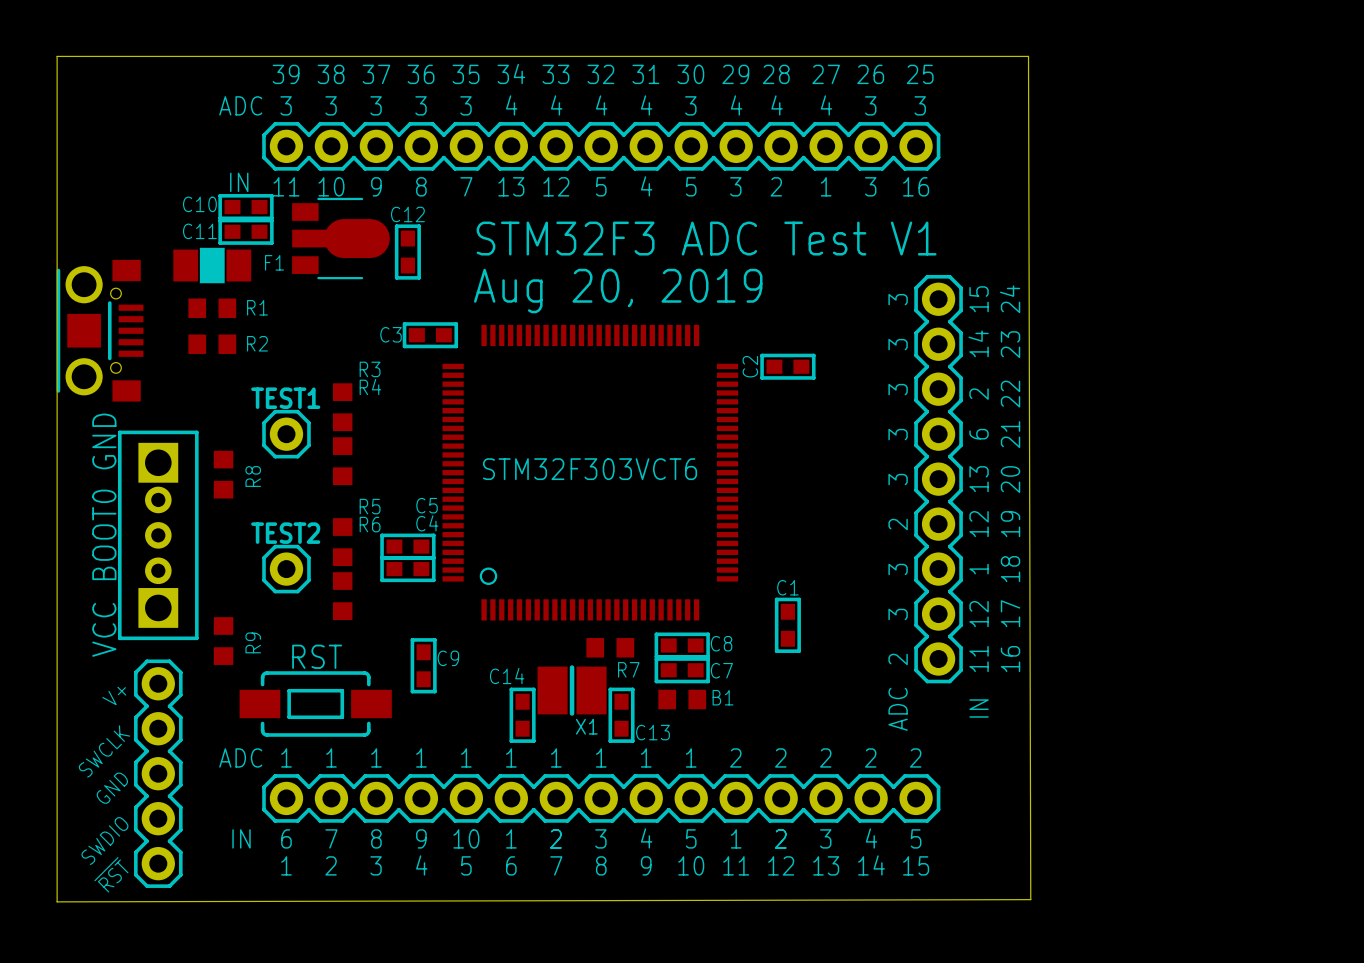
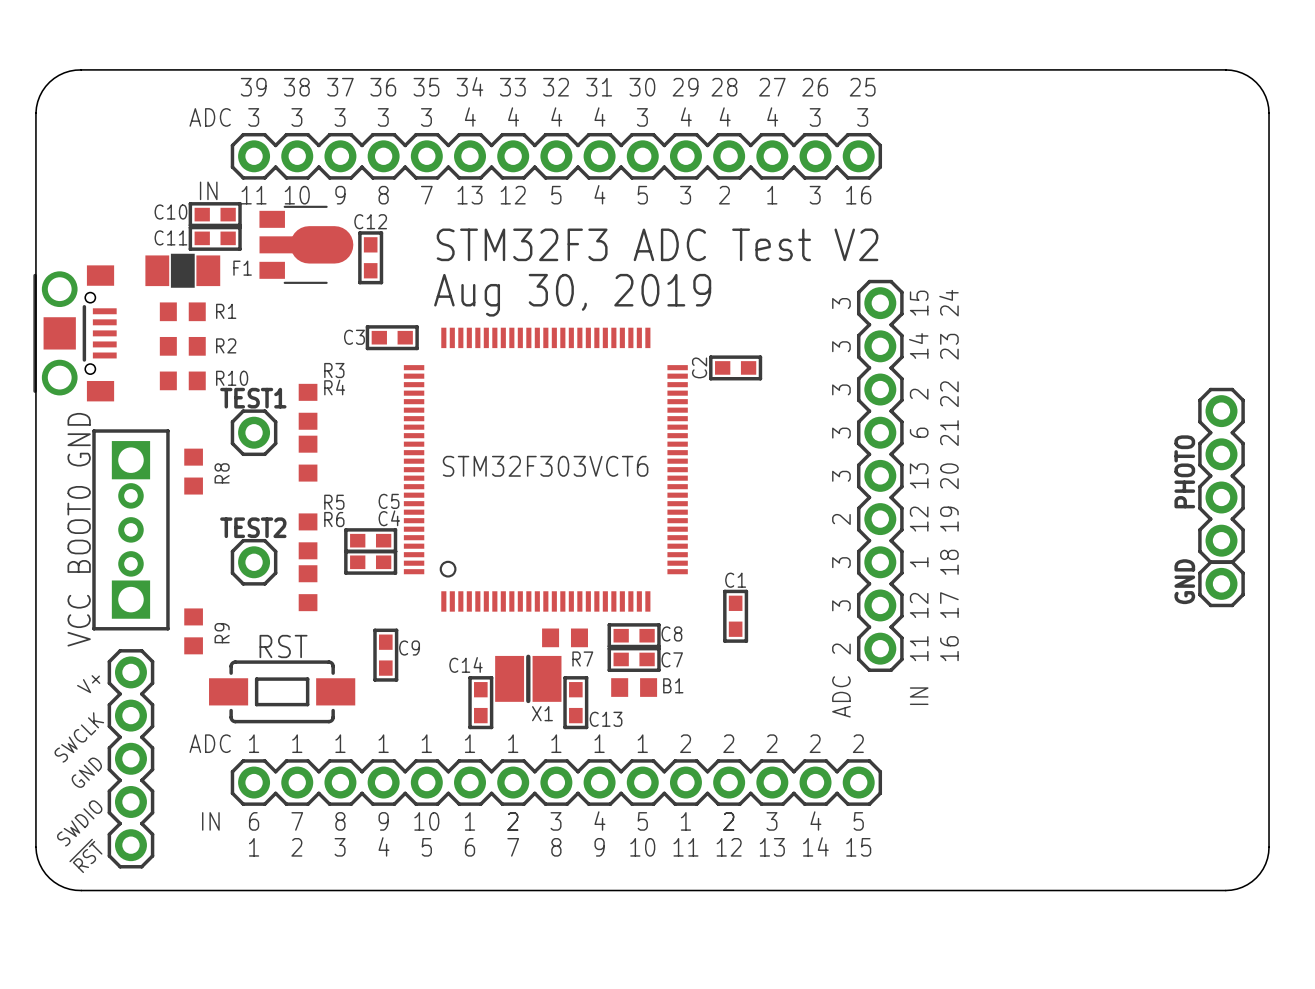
board edge: (106, 56) (57, 56) (57, 901) (1030, 899) (1028, 56) -> (81, 69) (64, 72) (49, 82) (39, 96) (35, 113) (35, 847) (39, 864) (45, 874) (54, 882) (69, 889) (81, 890) (1237, 889) (1252, 881) (1260, 873) (1267, 858) (1269, 847) (1267, 101) (1256, 82) (1242, 73) (1231, 70) (966, 69)
text: STM32F3 ADC Test V1 (706, 238) -> STM32F3 ADC Test V2 (657, 244)
text: Aug 20, 2019 (618, 291) -> Aug 30, 2019 (572, 295)
R10: none -> (182, 380)
PHOTO: none -> (1221, 475)
GND: none -> (1221, 583)

